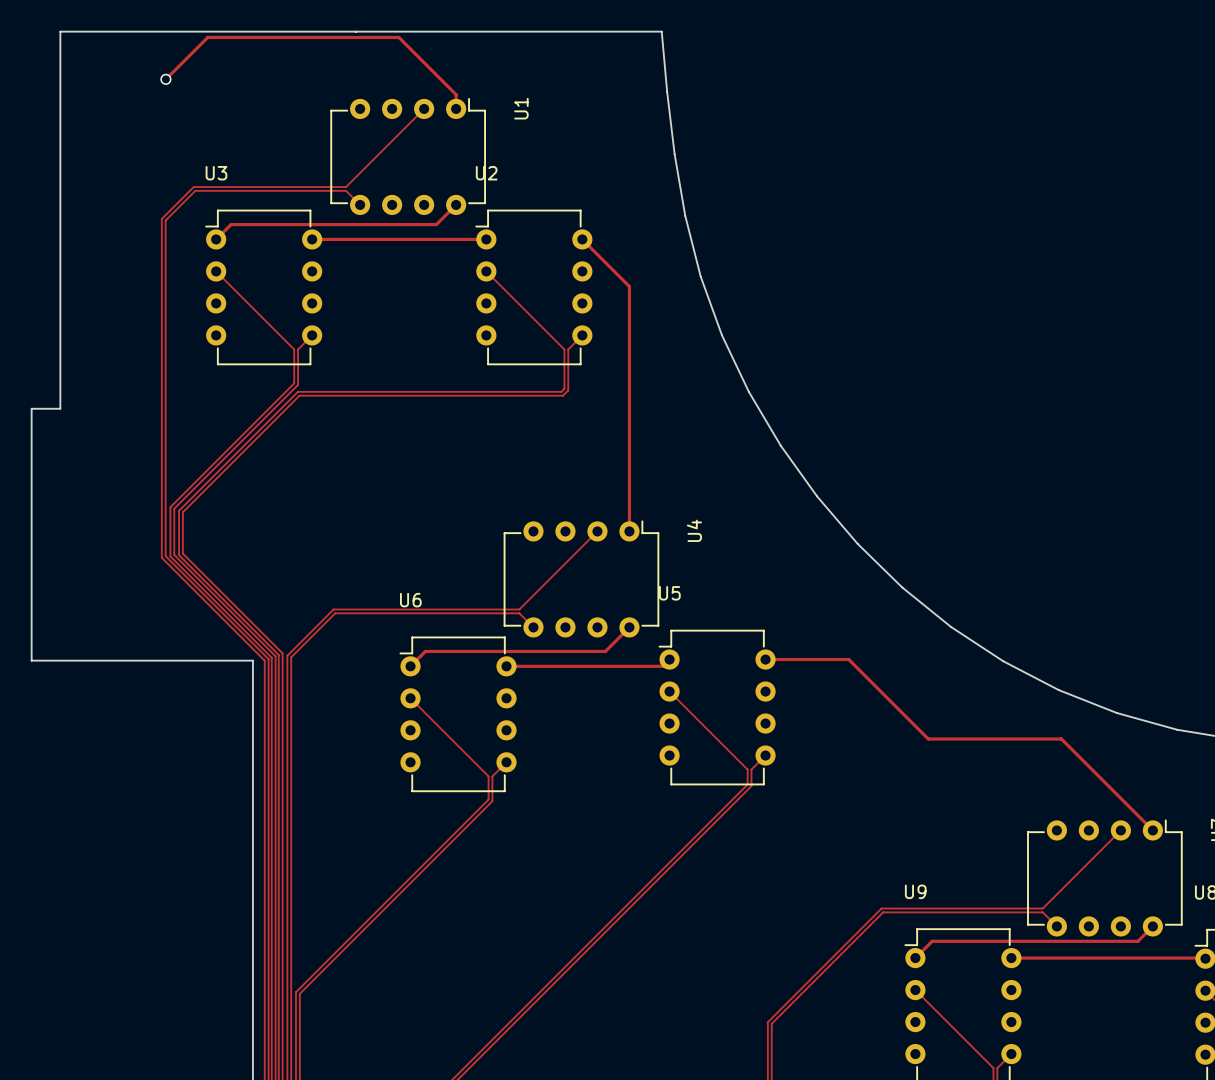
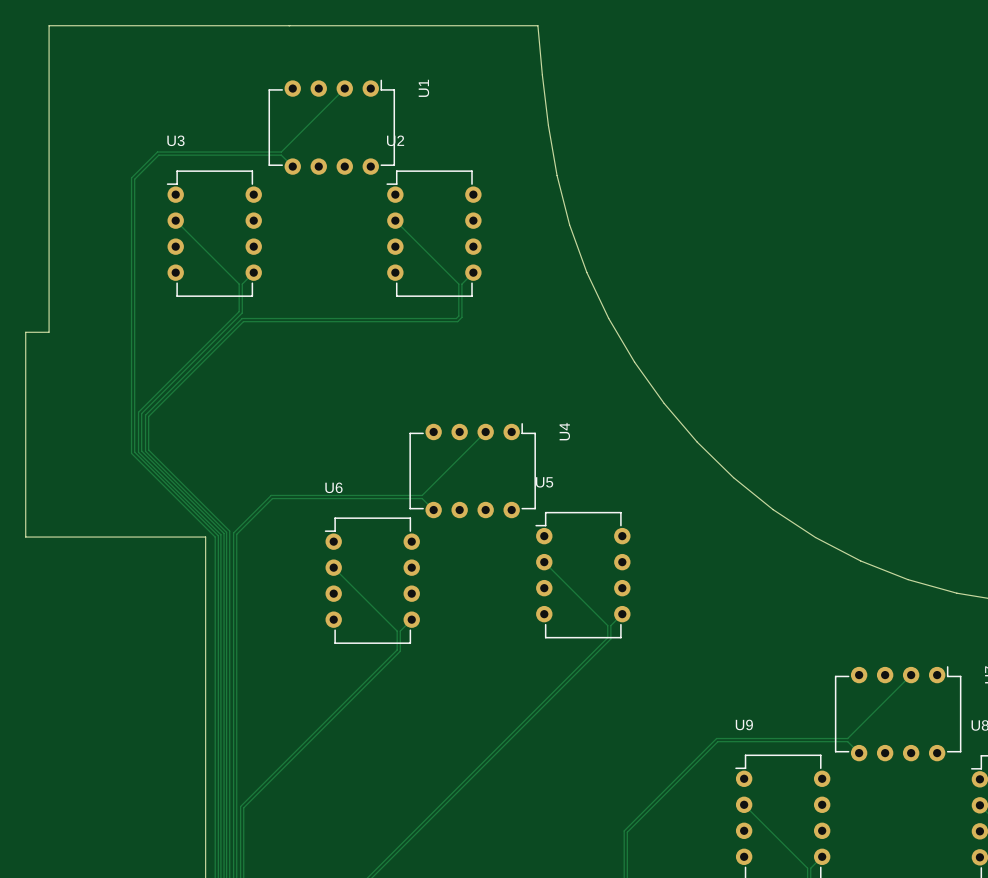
track: (165, 79) (207, 37) (398, 37) (456, 94) (456, 108) -> none
via: (165, 79) -> none
track: (456, 204) (436, 224) (231, 224) (216, 239) -> none
track: (312, 239) (486, 239) -> none
track: (582, 239) (629, 286) (629, 531) -> none
track: (629, 627) (605, 651) (425, 651) (410, 666) -> none
track: (669, 659) (662, 666) (506, 666) -> none
track: (765, 659) (848, 659) (928, 739) (1061, 739) (1152, 830) -> none
track: (1152, 926) (1138, 941) (932, 941) (915, 958) -> none
track: (1011, 958) (1205, 958) -> none

